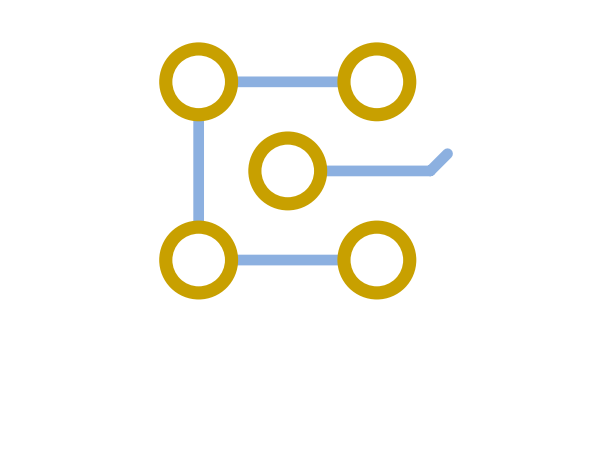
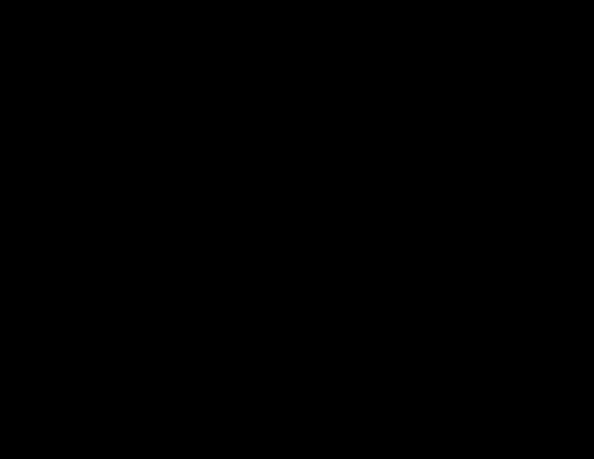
track: (376, 81) (198, 81) (198, 260) (376, 260) -> none
track: (447, 153) (430, 170) (287, 170) -> none
part: (287, 170) -> none

